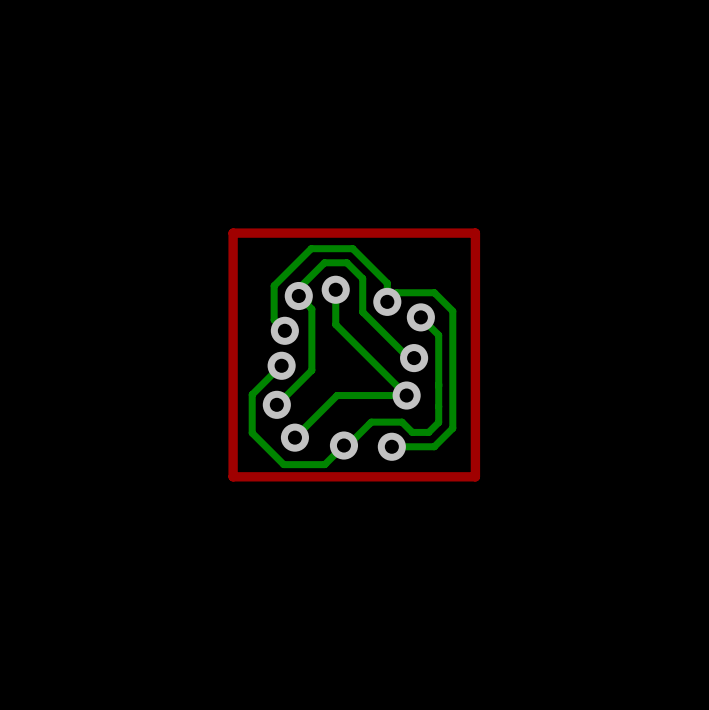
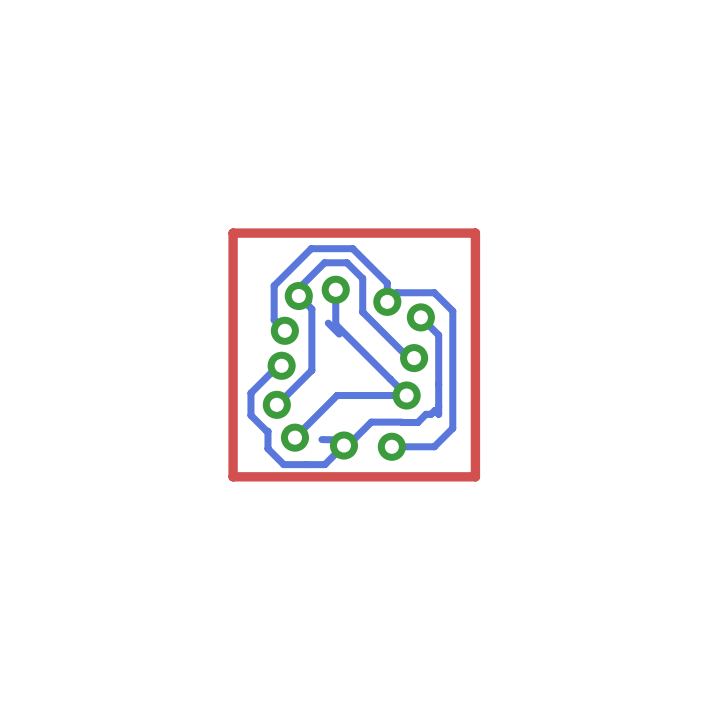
bottom track: none -> (328, 323) (339, 334)
bottom track: (281, 365) (252, 394) (252, 433) (267, 448) -> (281, 366) (277, 366) (250, 393) (250, 415) (267, 431) (267, 448)
bottom track: (438, 414) (438, 422) (428, 432) (412, 432) (402, 422) -> (438, 414) (434, 410) (431, 414) (426, 414) (417, 422) (402, 422)
bottom track: none -> (333, 439) (321, 439)

